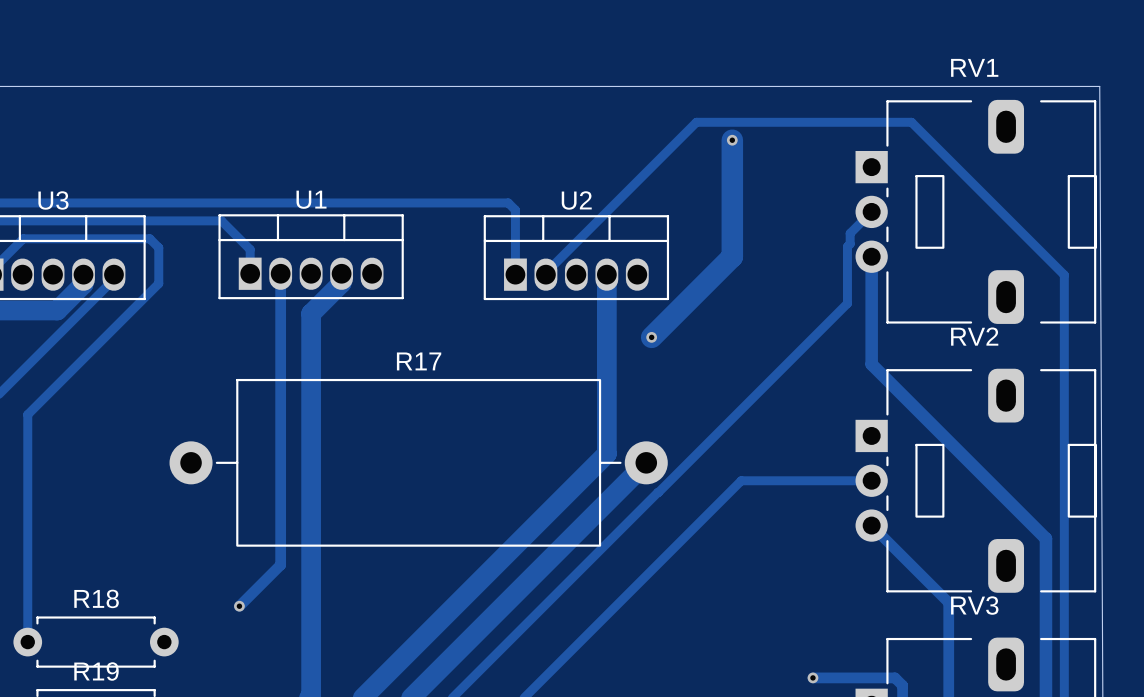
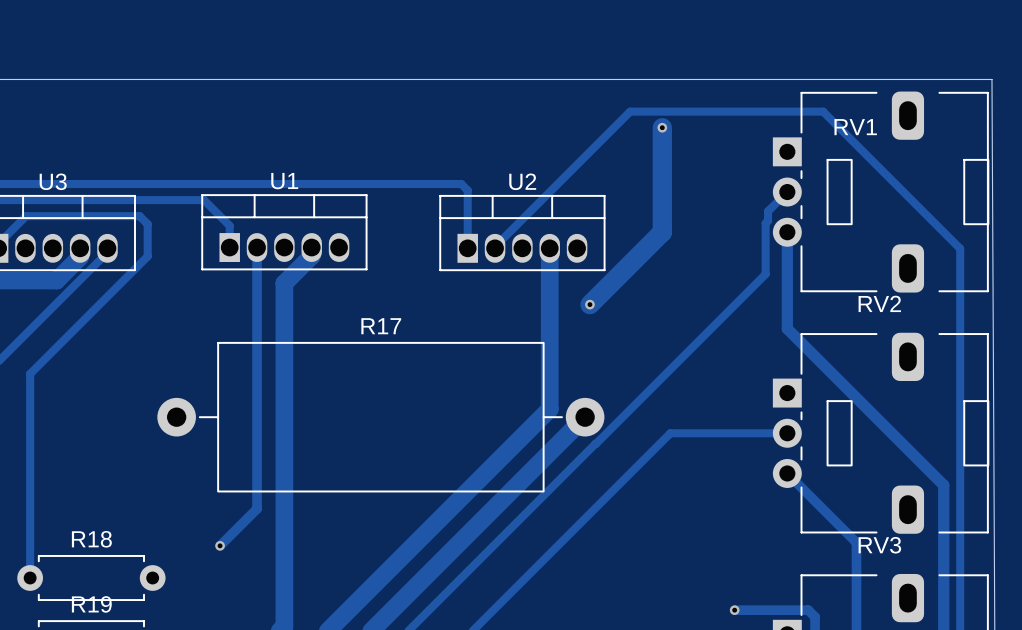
RV1 name position: RV1 (974, 67) -> RV1 (855, 127)

